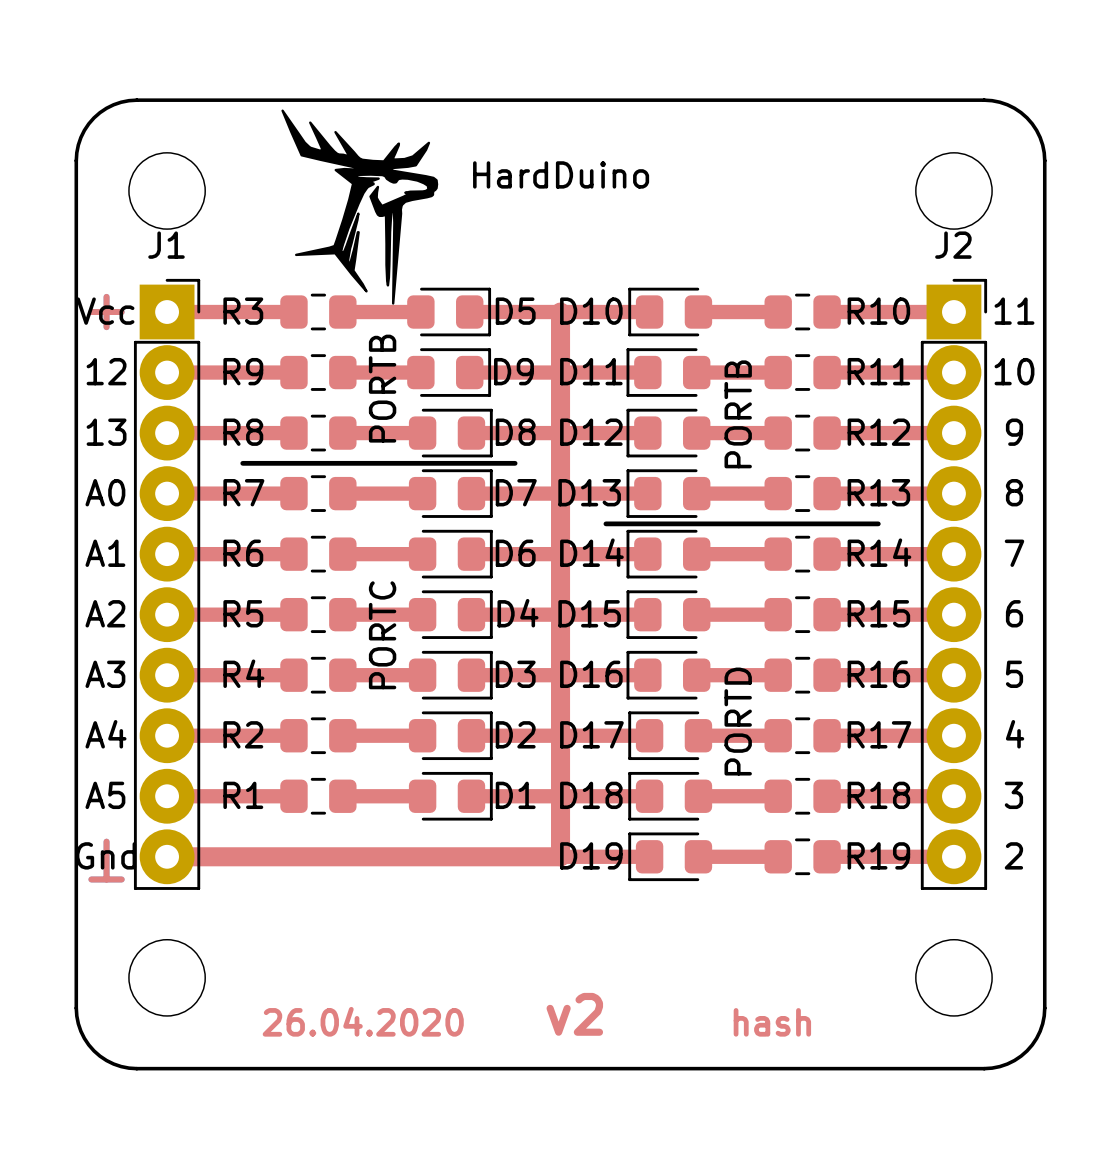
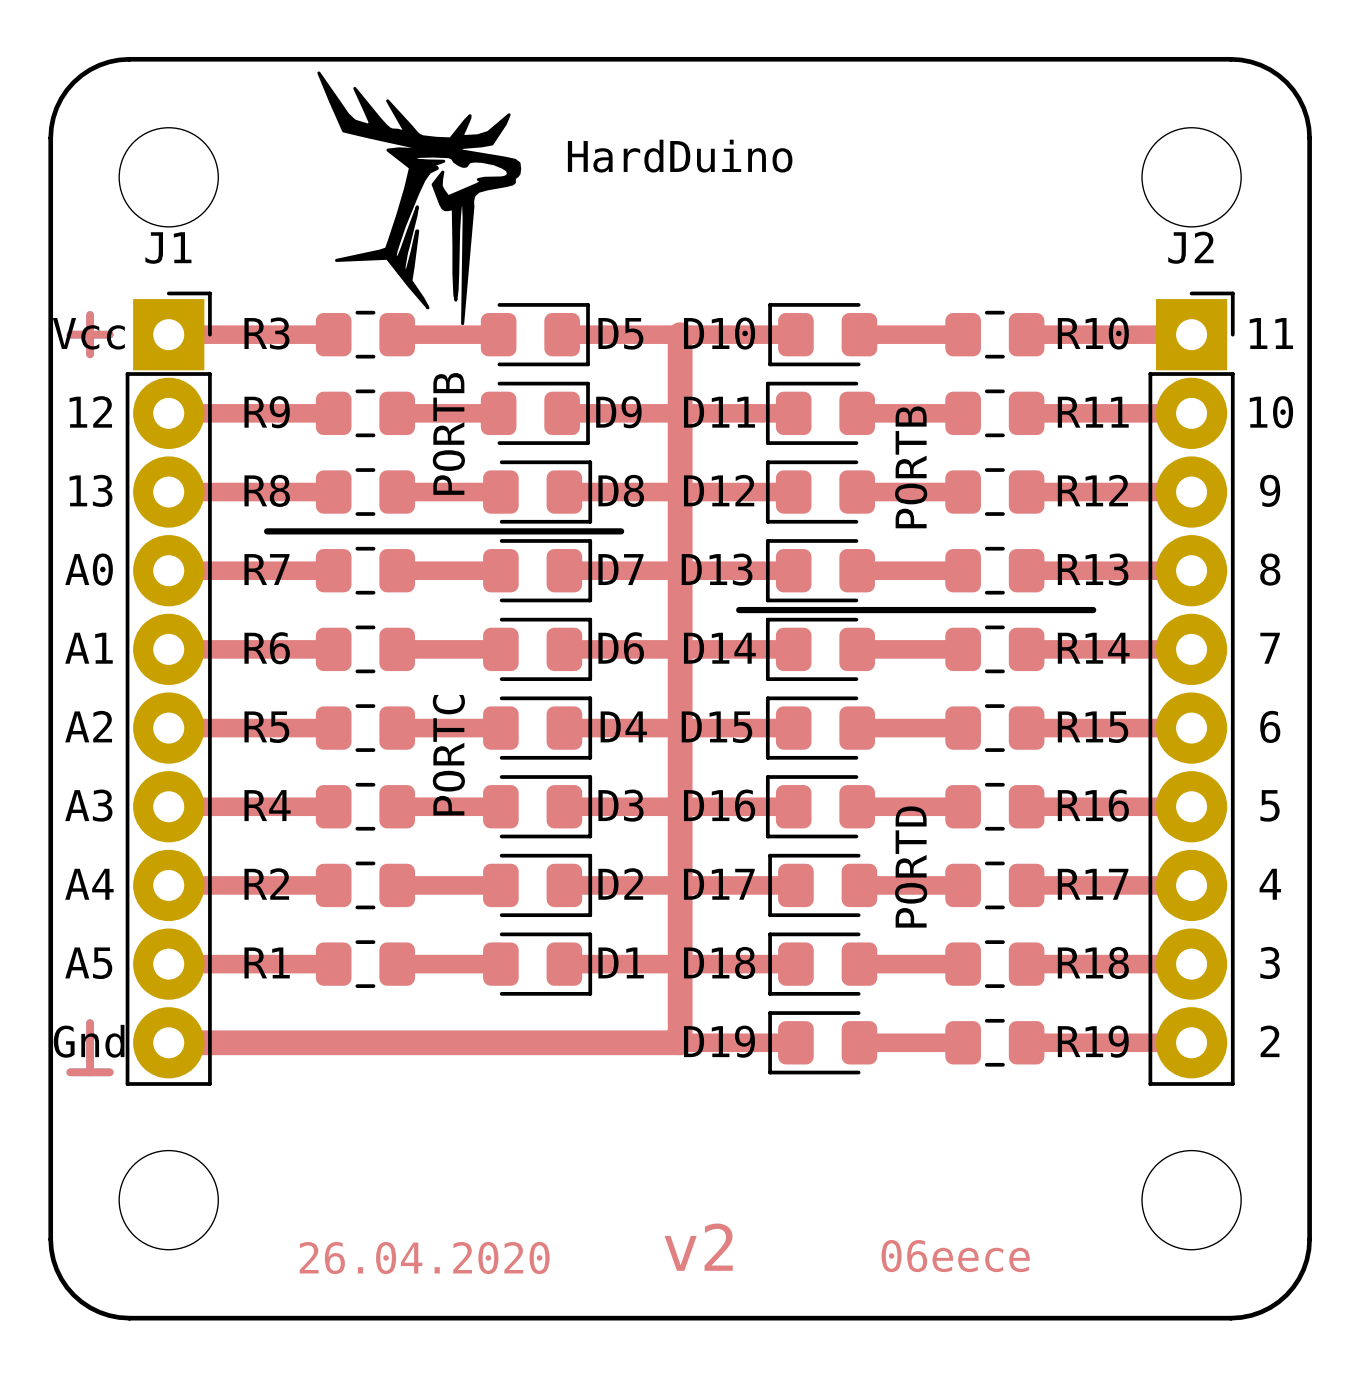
text: hash (772, 1022) -> 06eece (955, 1256)

